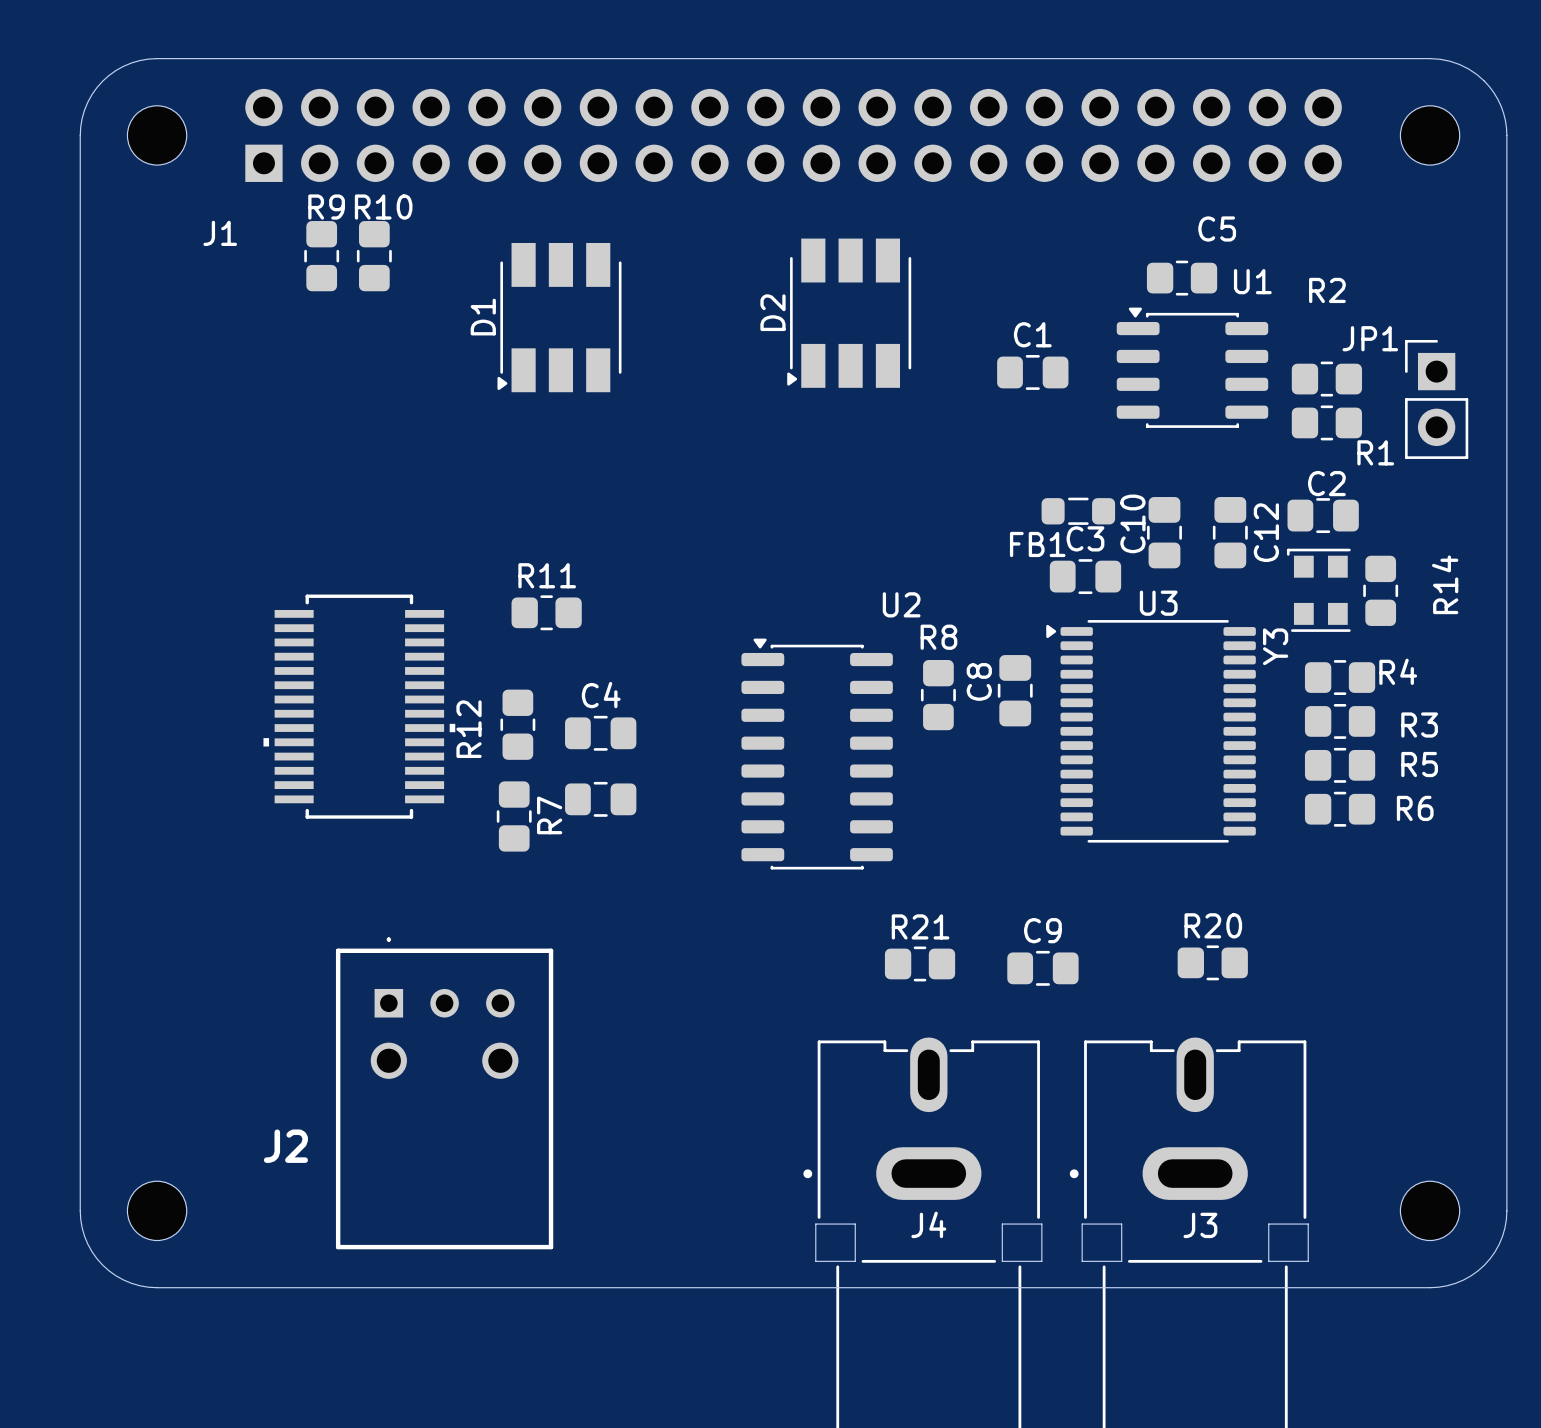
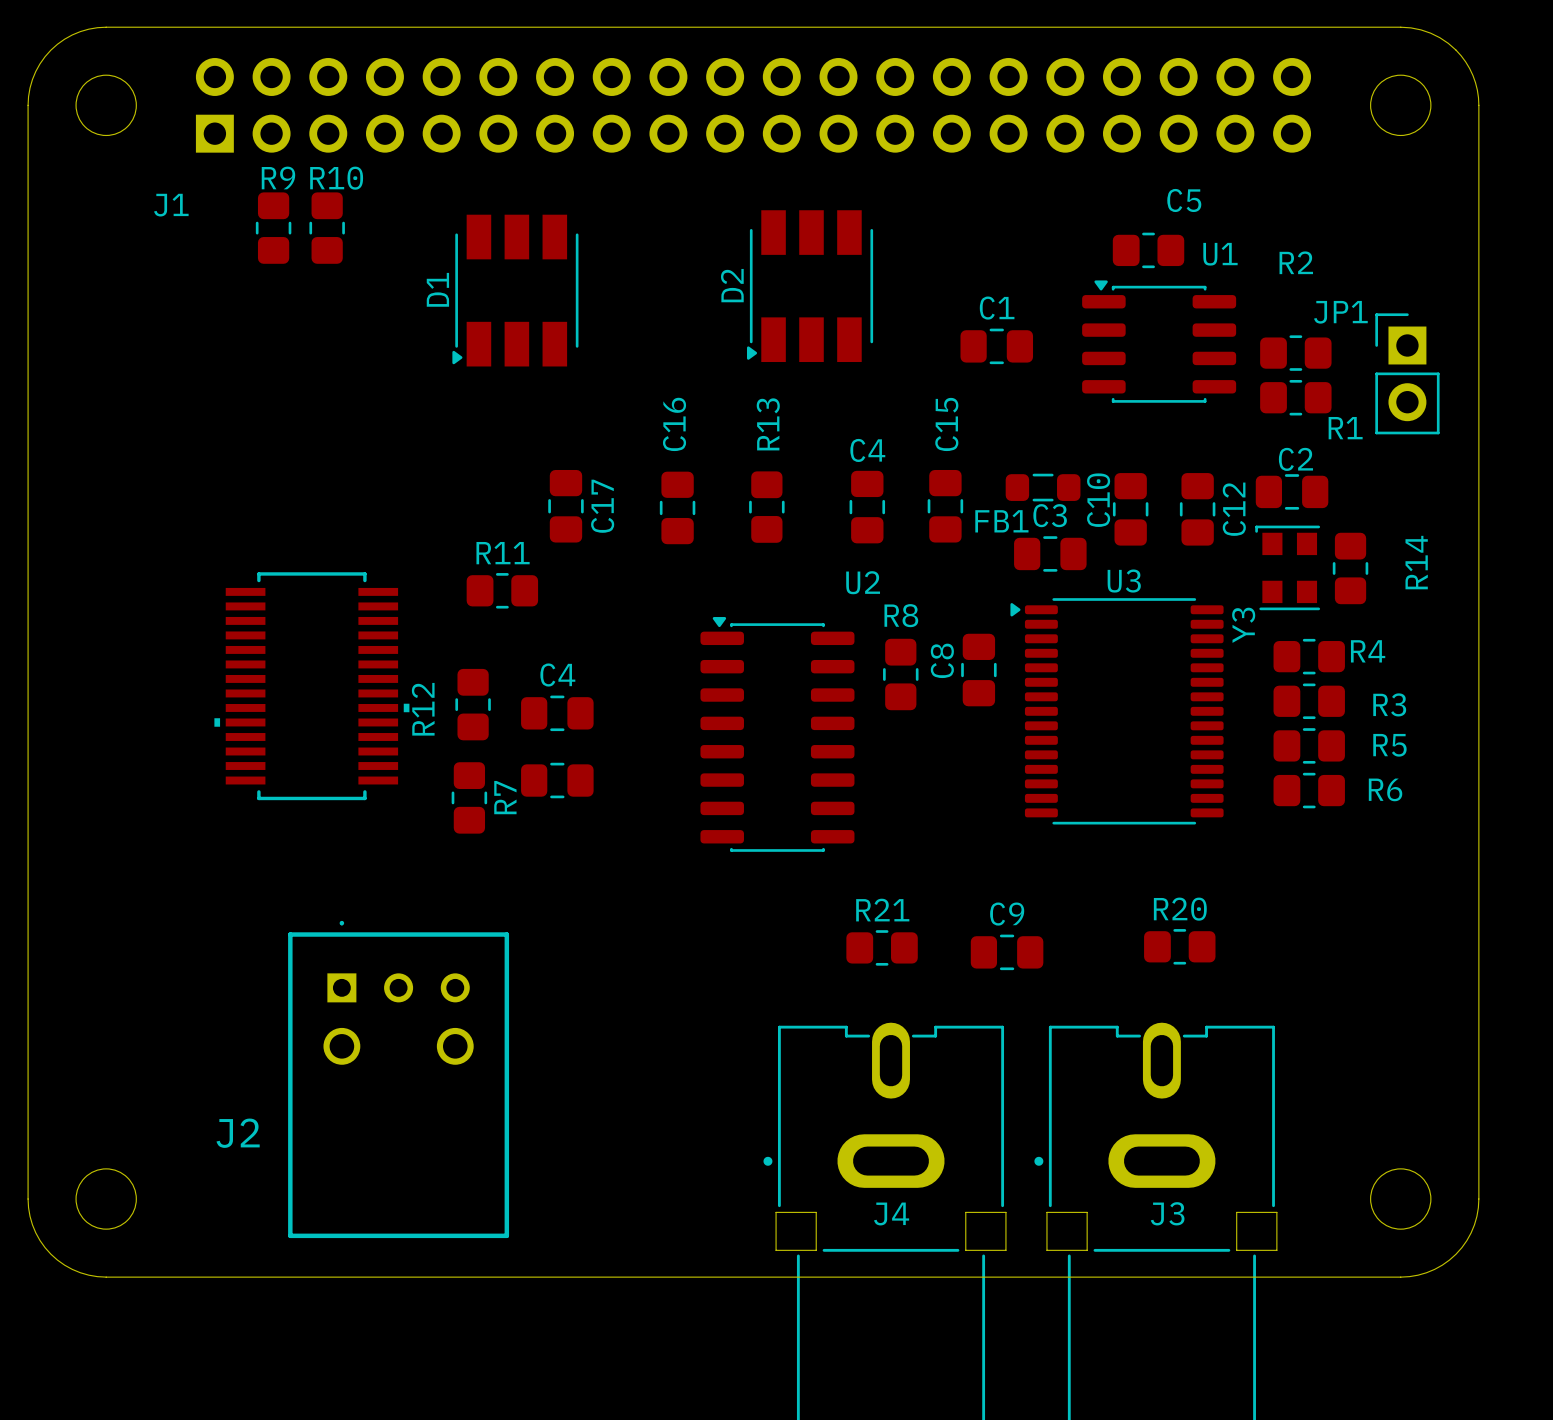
C17: none -> (565, 506)
C15: none -> (945, 506)
R13: none -> (766, 507)
C4: none -> (867, 507)
C16: none -> (677, 507)

